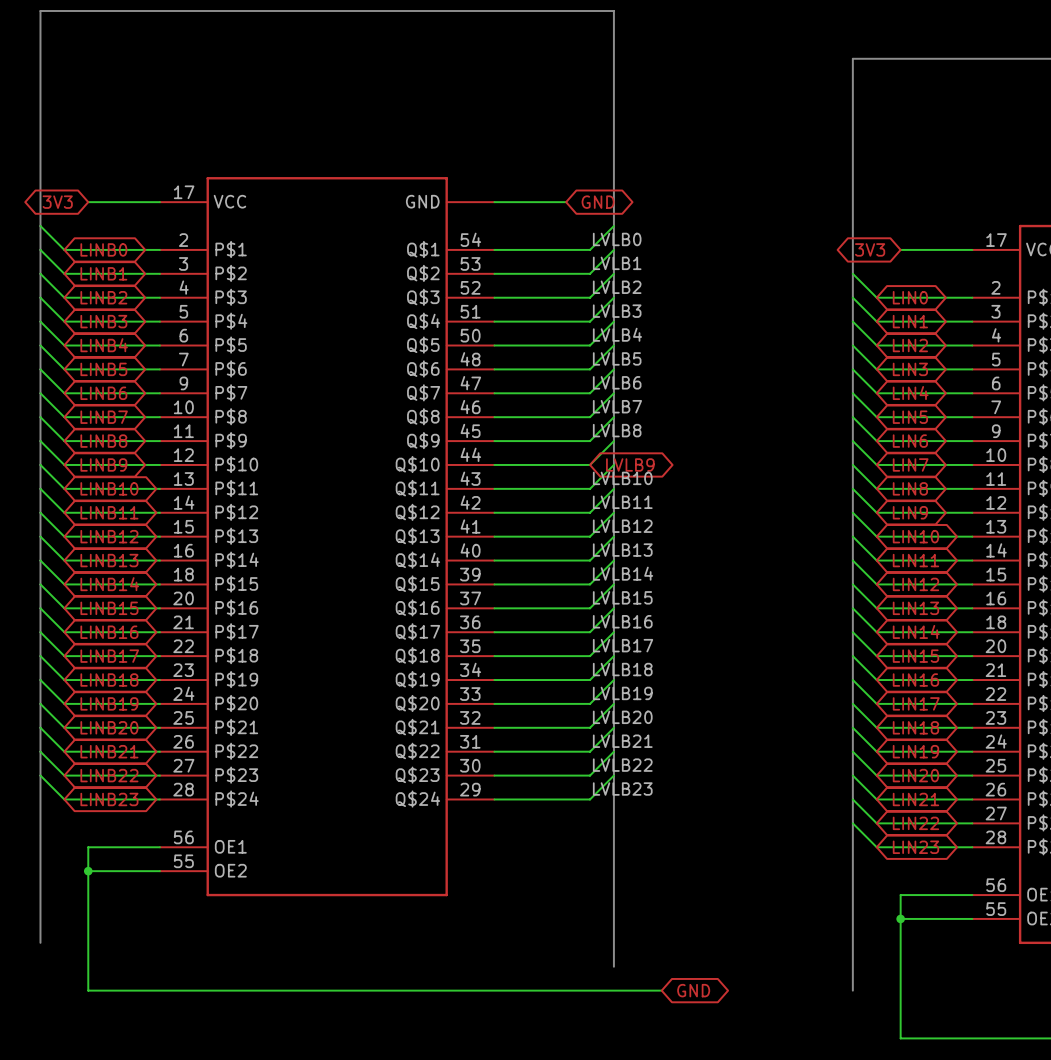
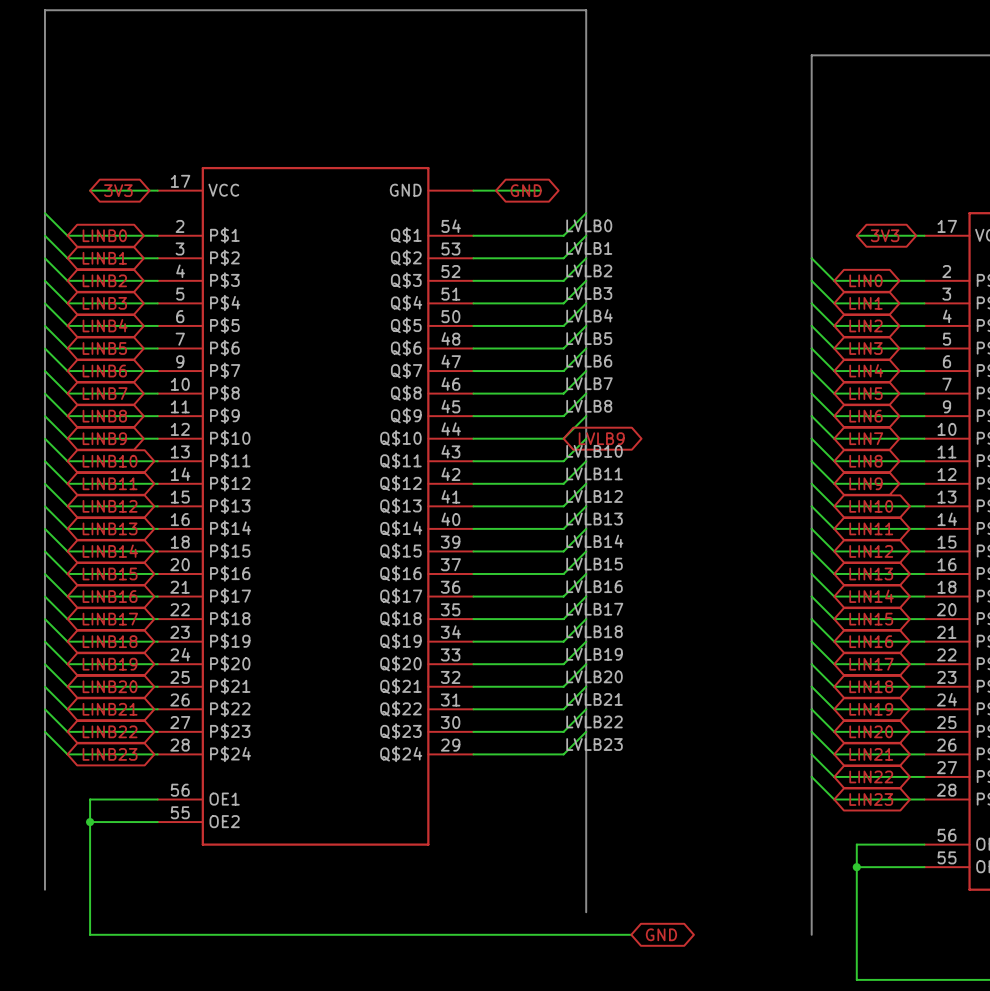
global label rotation: 0° (57, 202) -> 180° (118, 190)
global label position: 3V3 (57, 202) -> 3V3 (118, 190)
global label position: GND (598, 202) -> GND (526, 190)
global label rotation: 0° (870, 249) -> 180° (885, 235)

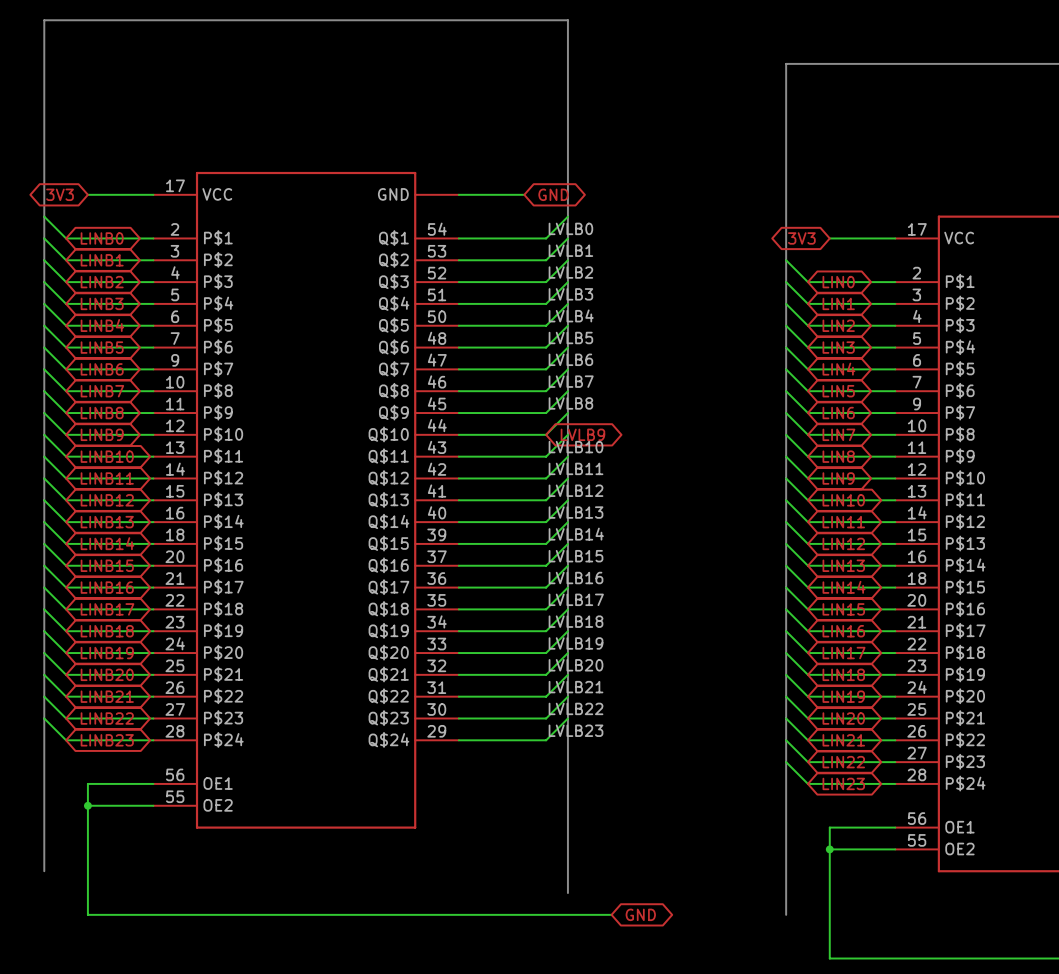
global label rotation: 0° (118, 190) -> 180° (60, 194)
global label position: 3V3 (118, 190) -> 3V3 (60, 194)
global label position: GND (526, 190) -> GND (553, 194)
global label rotation: 0° (885, 235) -> 180° (801, 238)

